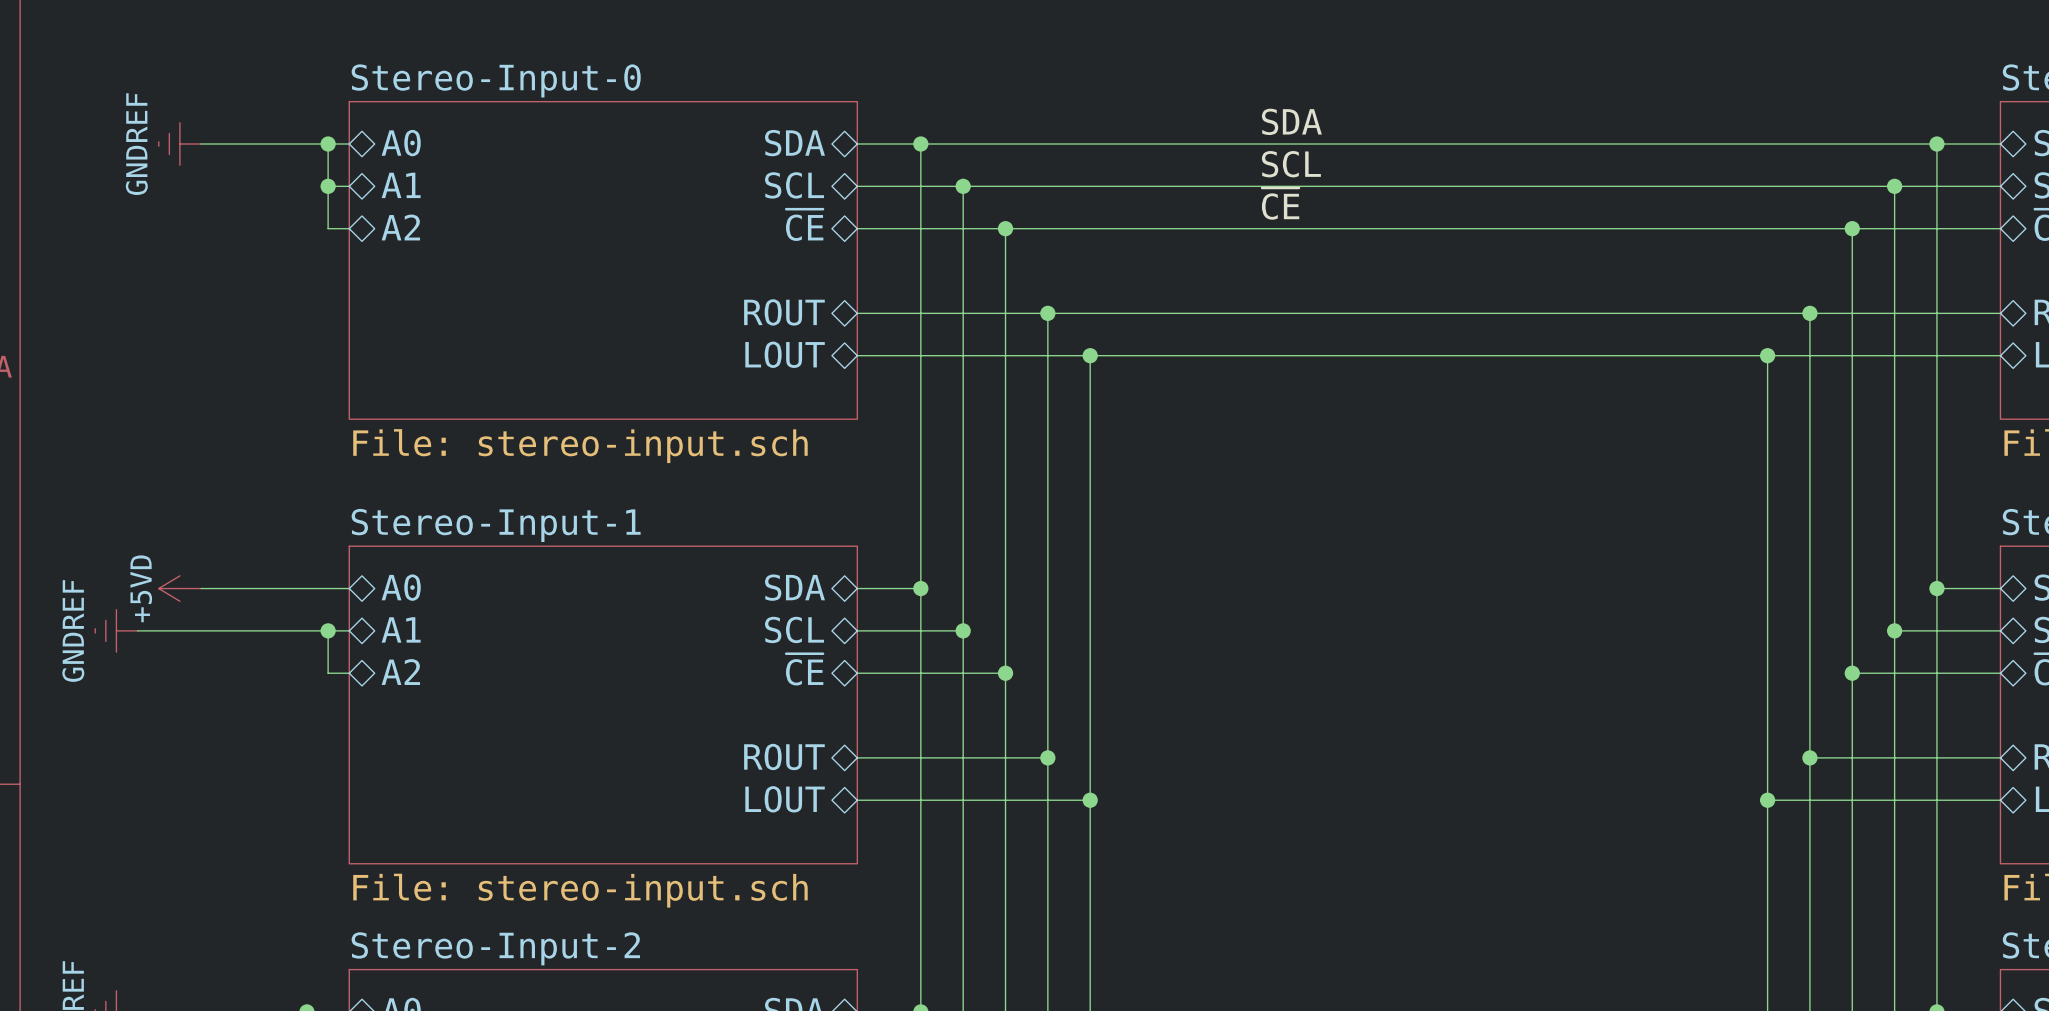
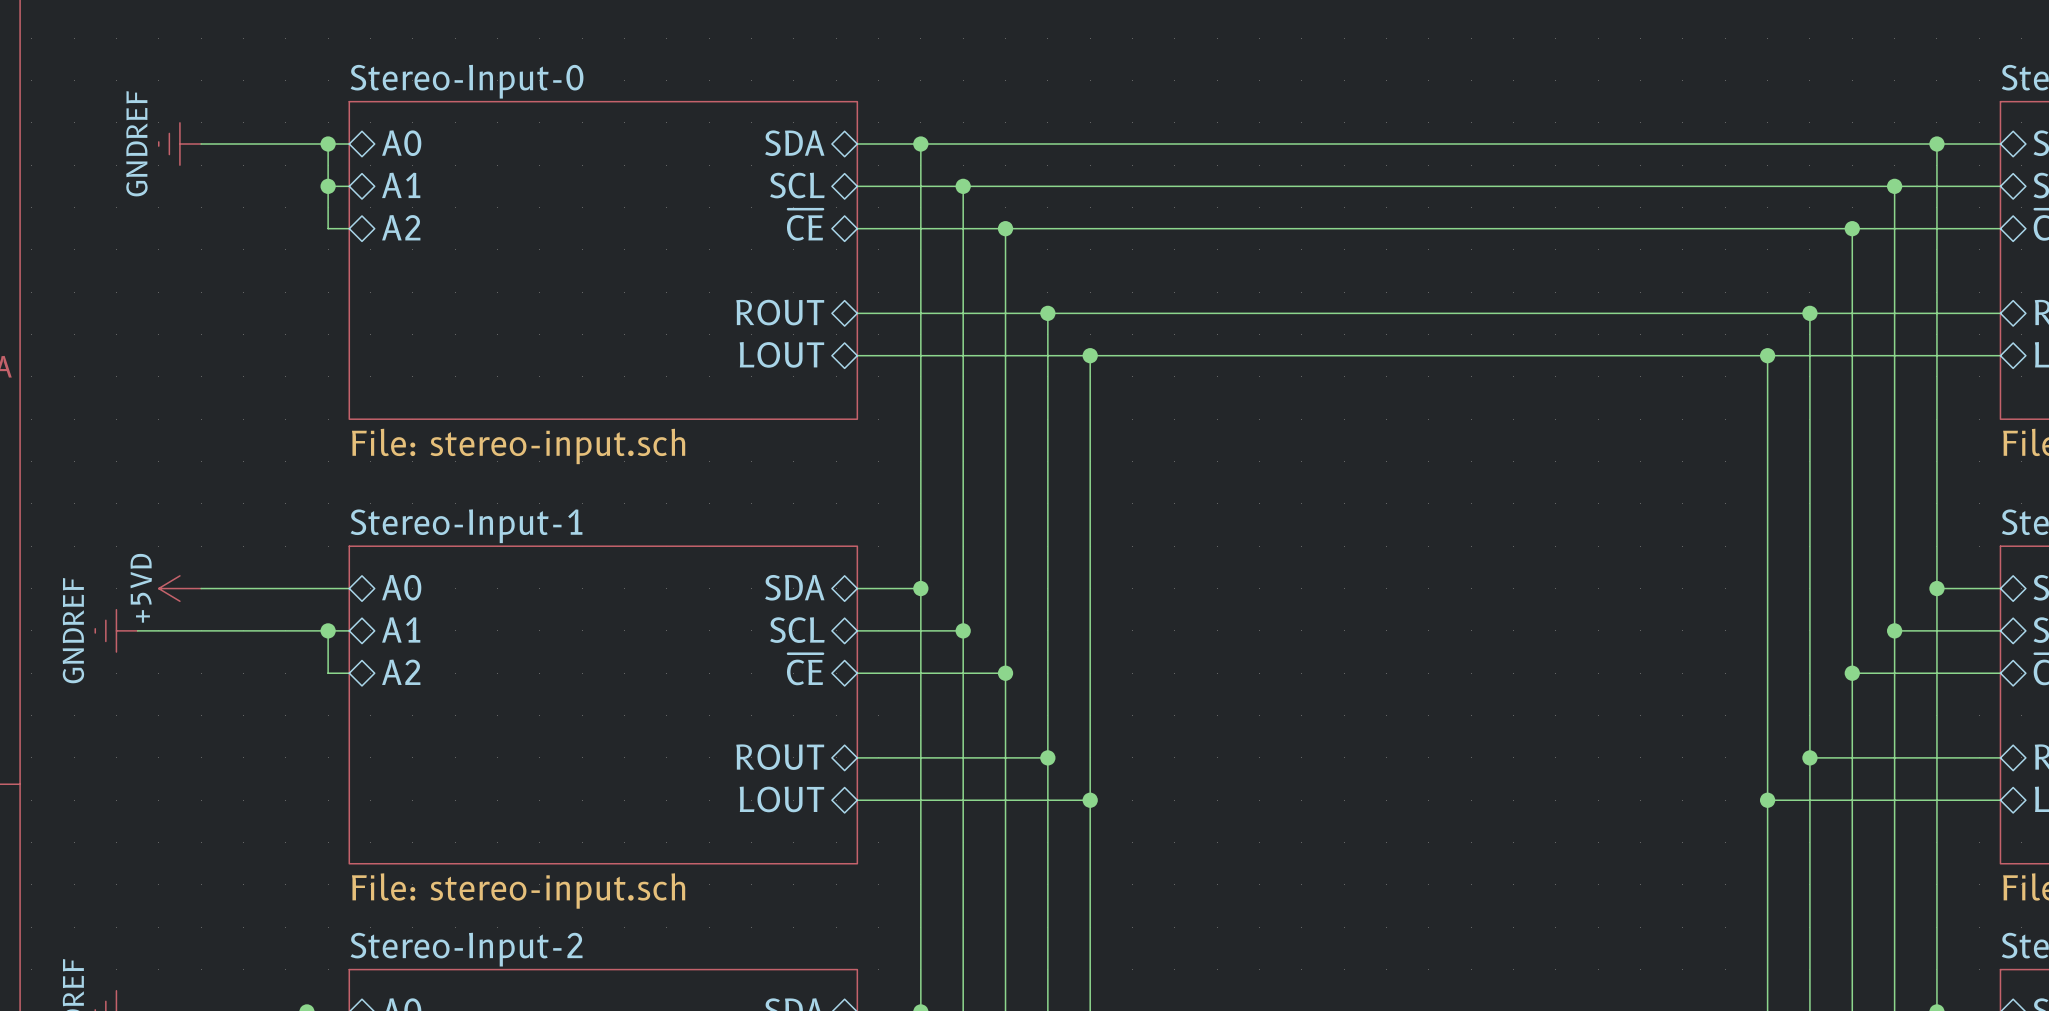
label: SDA (1291, 121) -> none
label: SCL (1291, 164) -> none
label: ~{CE} (1280, 203) -> none

